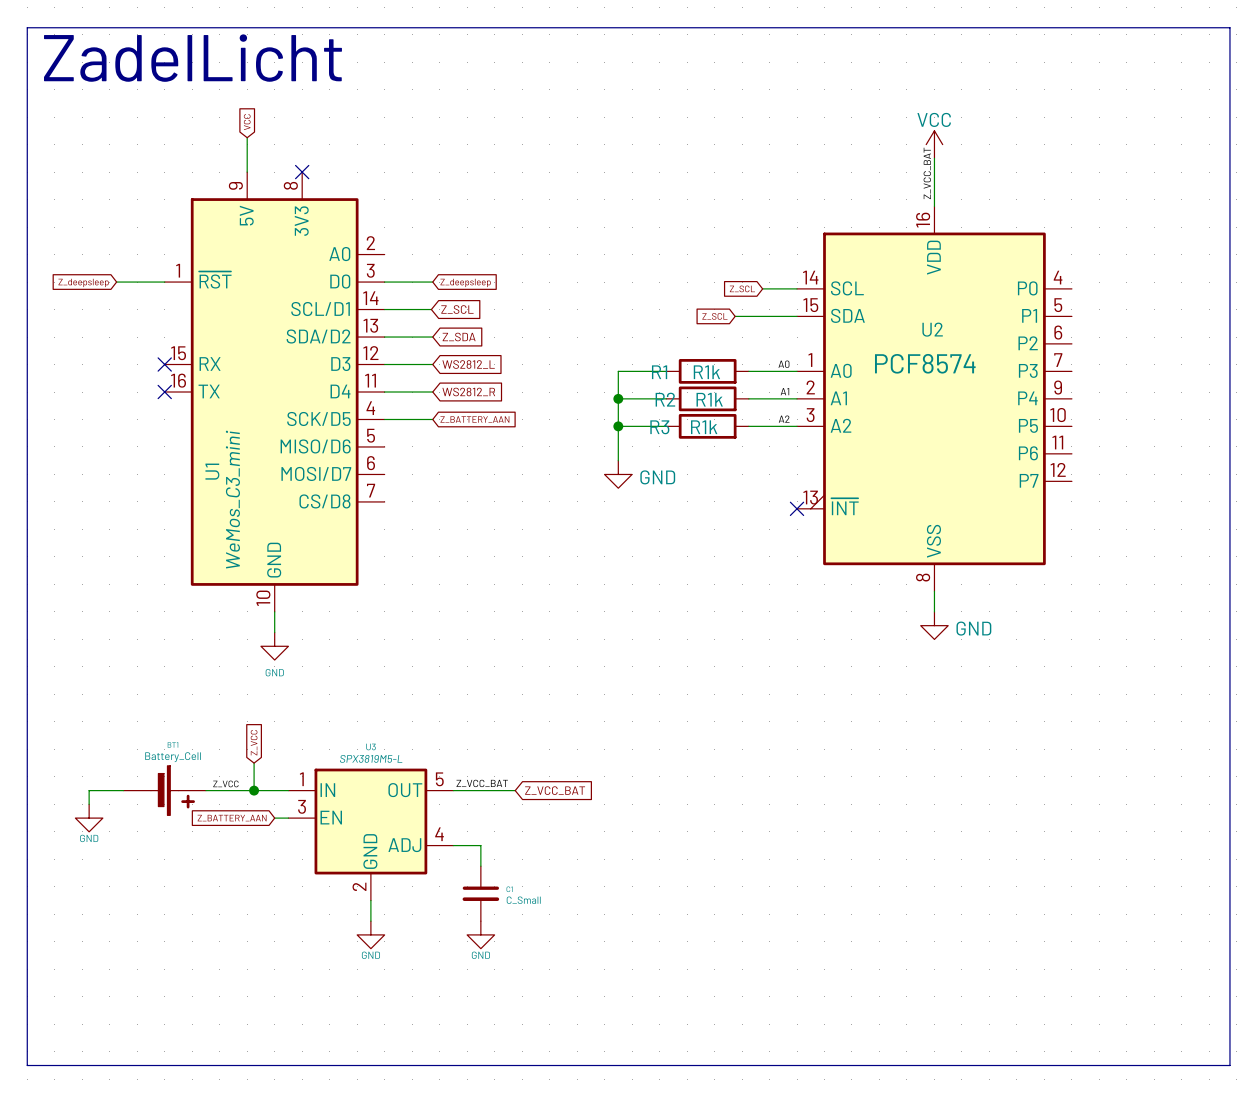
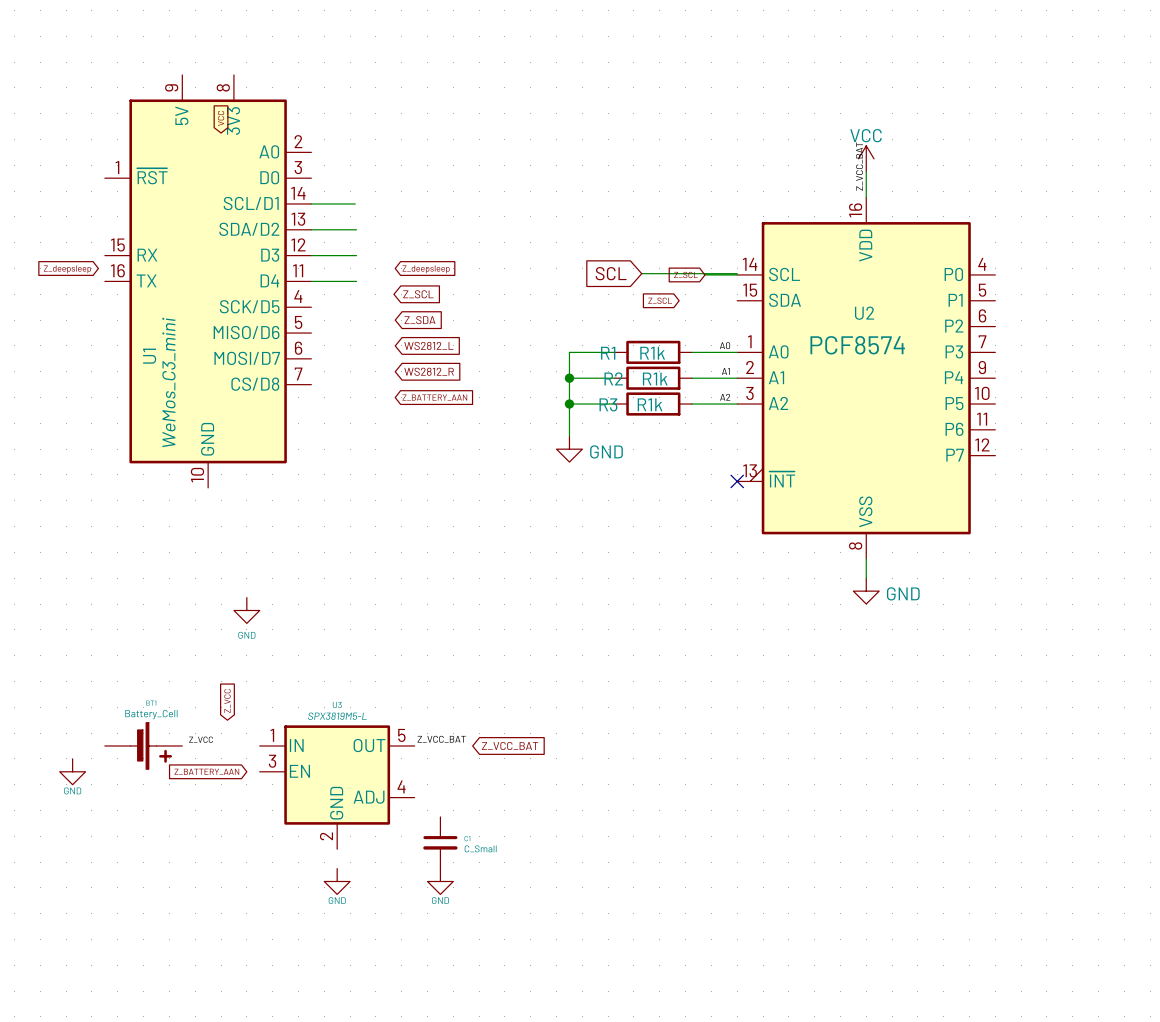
line: (27, 27) (1229, 27) (1229, 1065) (27, 1065) (27, 27) -> none
text: ZadelLicht (192, 58) -> none
power symbol position: VCC (934, 144) -> VCC (866, 158)
no-connect mark: (302, 172) -> none
wire: (116, 282) (164, 282) -> none
wire: (384, 282) (432, 282) -> none
global label: none -> SCL (611, 273)
wire: none -> (641, 273) (737, 273)
wire: (384, 309) (431, 309) -> (311, 203) (355, 203)
wire: (735, 316) (797, 316) -> none
wire: (384, 337) (432, 337) -> (311, 229) (356, 229)
no-connect mark: (164, 364) -> none
wire: (384, 364) (432, 364) -> (311, 255) (356, 255)
no-connect mark: (164, 392) -> none
U1 position: (274, 392) -> (208, 281)
wire: (384, 392) (432, 392) -> (311, 281) (356, 281)
wire: (384, 419) (432, 419) -> none
wire: (274, 611) (274, 632) -> none
wire: (254, 763) (254, 790) -> none
wire: (123, 790) (89, 790) (89, 804) -> none
wire: (205, 790) (288, 790) -> none
junction: (254, 790) -> none
wire: (453, 790) (515, 790) -> none
wire: (274, 818) (288, 818) -> none
wire: (453, 845) (480, 845) (480, 866) -> none
wire: (370, 900) (370, 921) -> none

